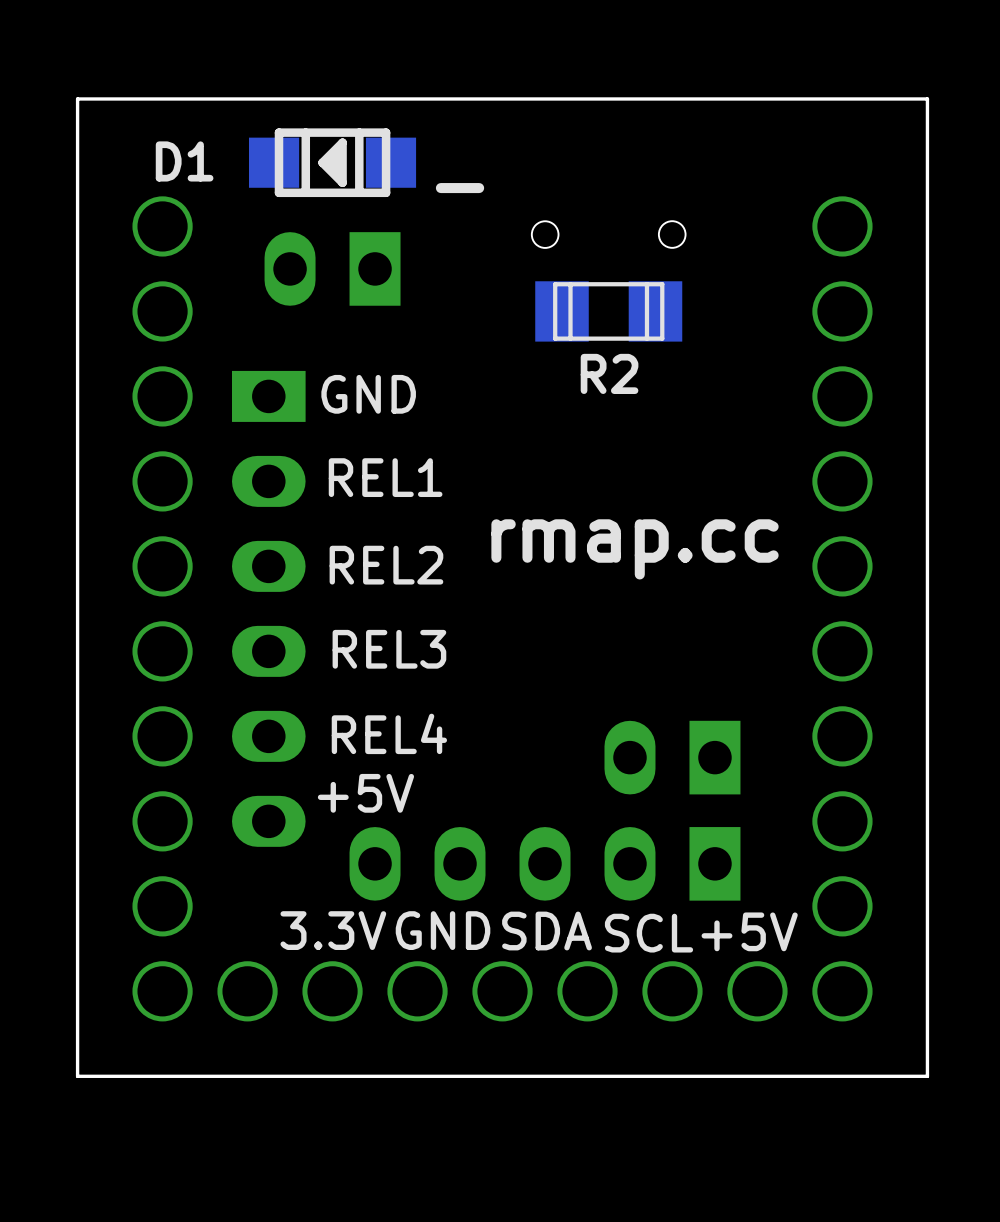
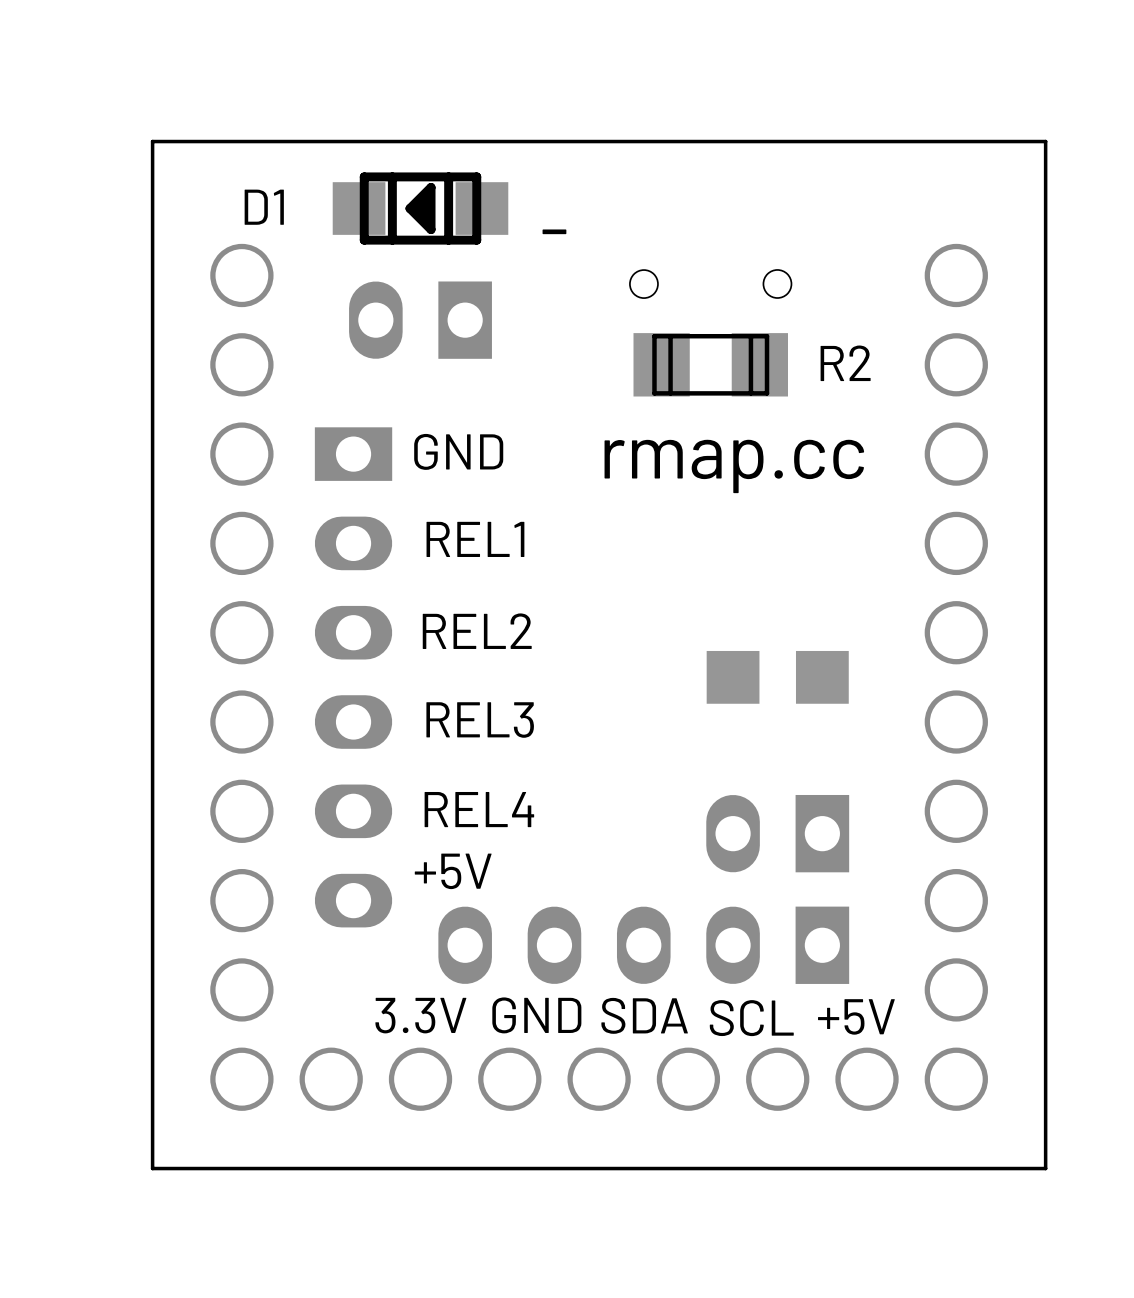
R2 name position: R2 (609, 373) -> R2 (845, 363)
text position: rmap.cc (635, 549) -> rmap.cc (734, 466)
part: none -> (733, 677)
part: none -> (822, 677)

